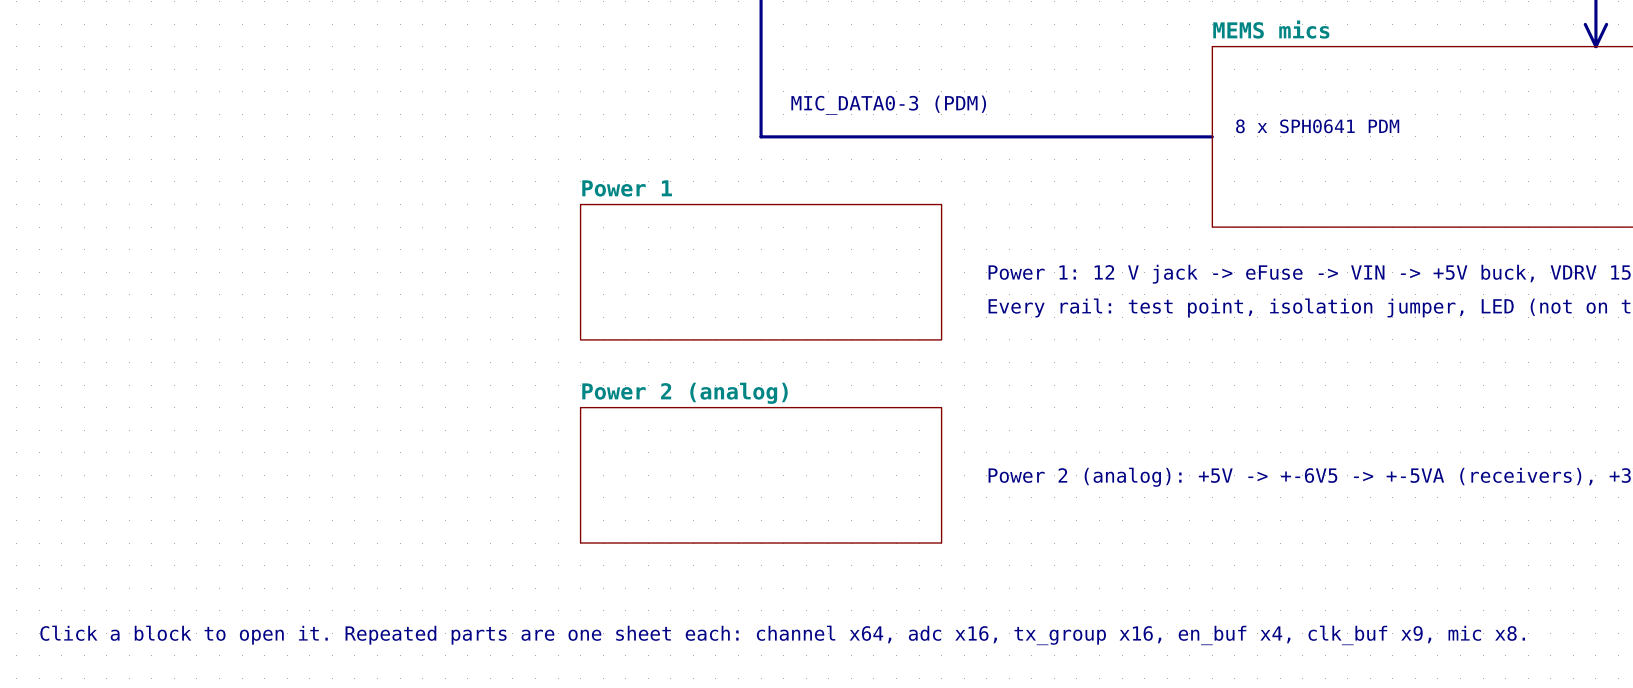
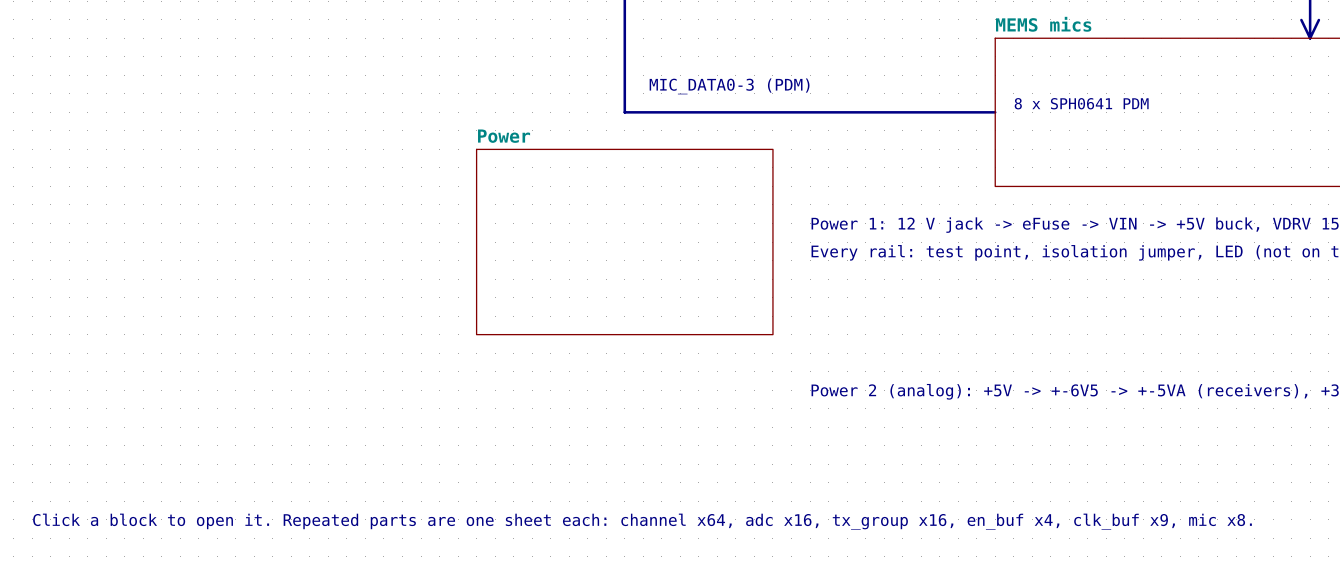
sheet Power 1: (761, 272) -> none
sheet Power: none -> (624, 242)
sheet Power 2 (analog): (761, 475) -> none

